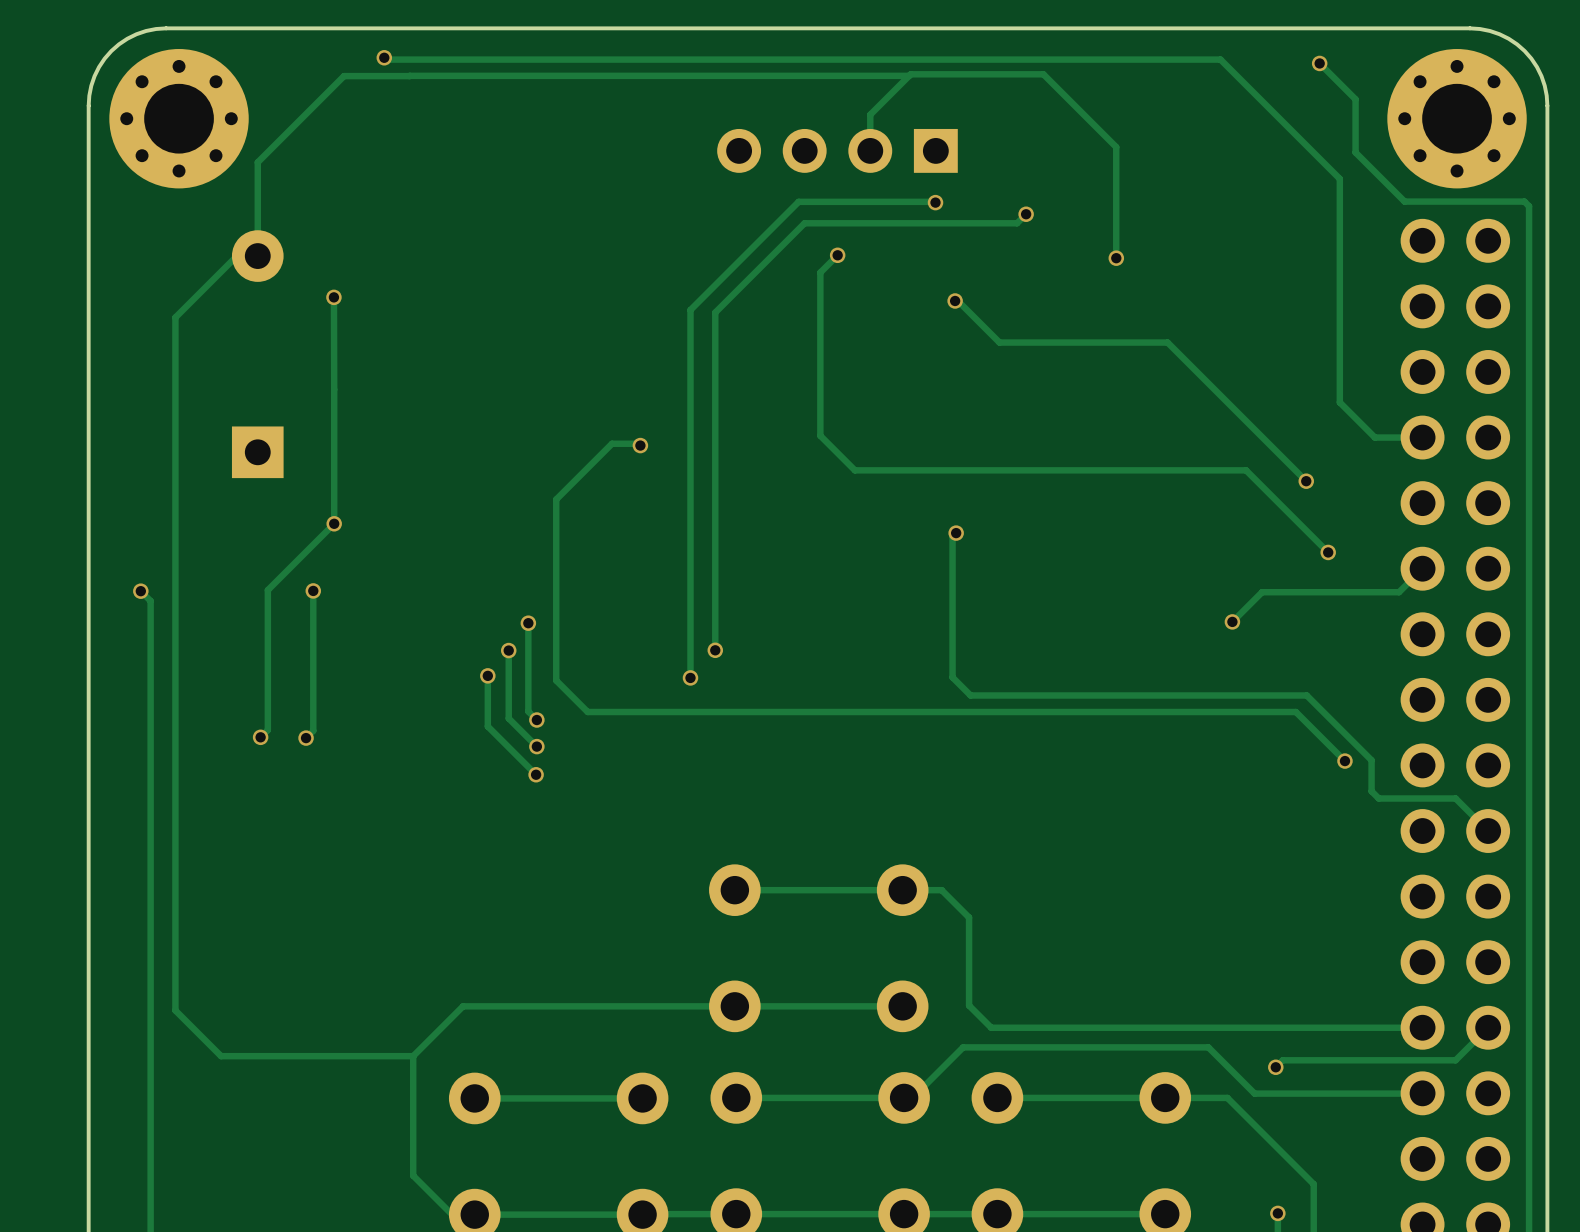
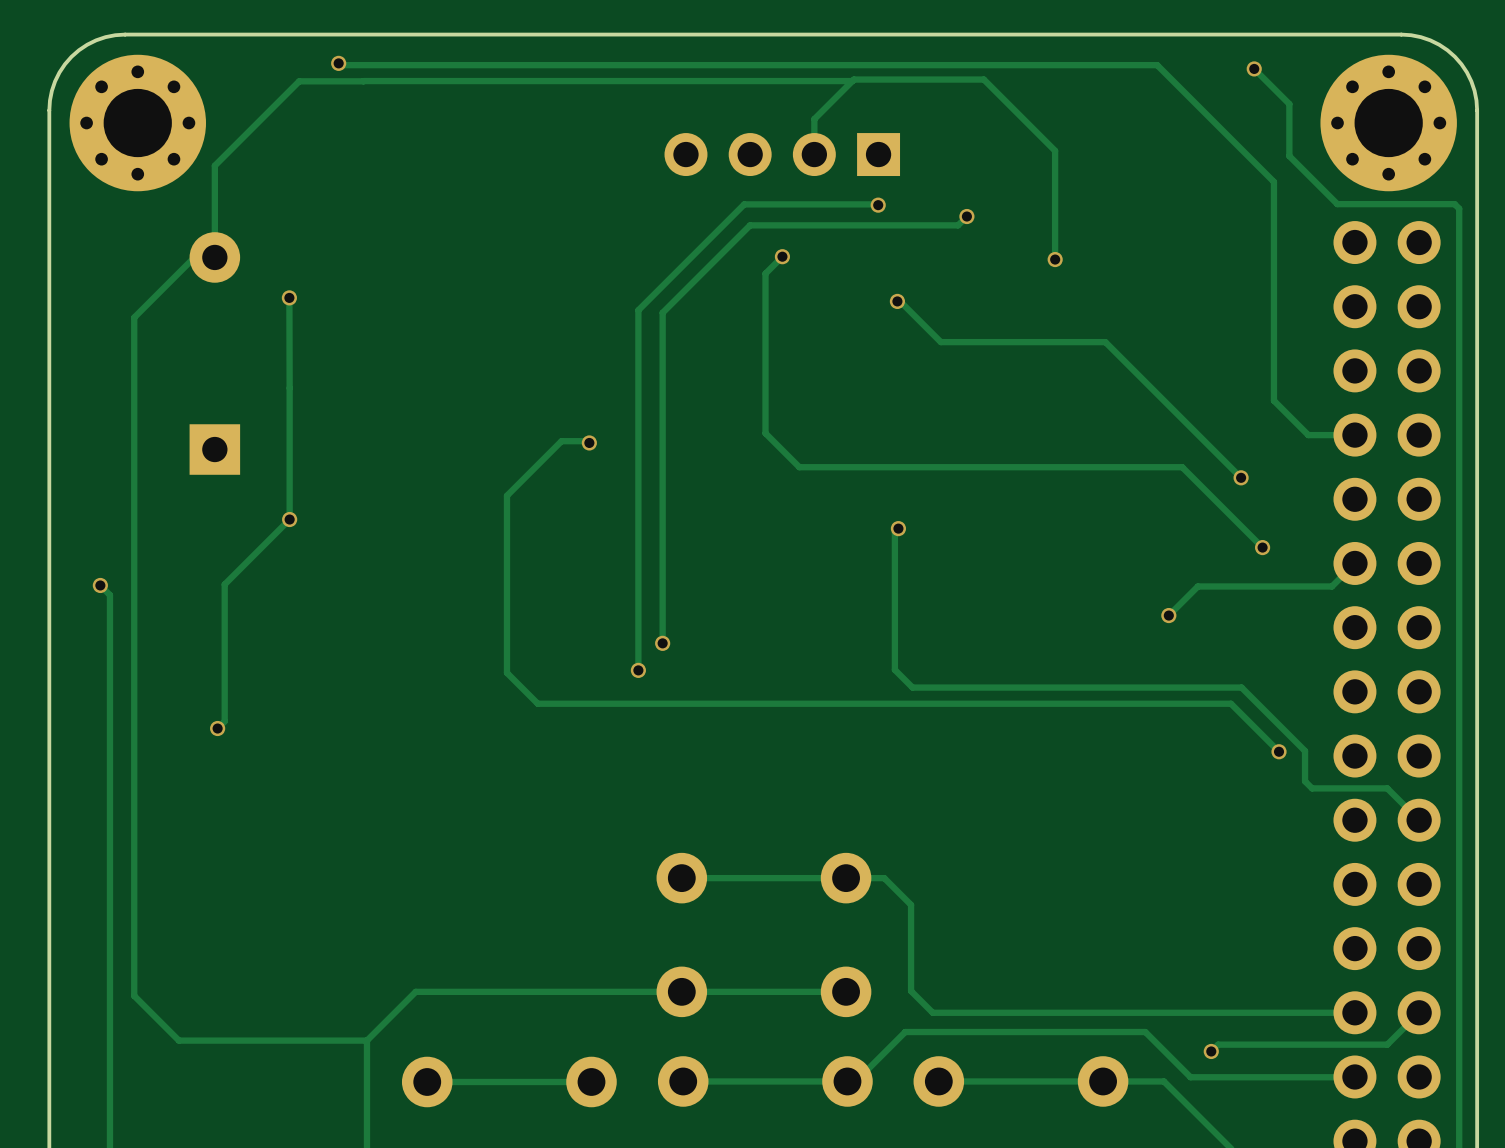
track: (313, 590) (313, 730) (306, 738) -> none
via: (313, 590) -> none
track: (528, 623) (528, 711) (536, 720) -> none
via: (528, 623) -> none
track: (508, 650) (508, 718) (536, 746) -> none
via: (508, 650) -> none
track: (487, 675) (487, 726) (536, 774) -> none
via: (487, 675) -> none
via: (536, 720) -> none
via: (306, 738) -> none
via: (536, 746) -> none
via: (536, 774) -> none

